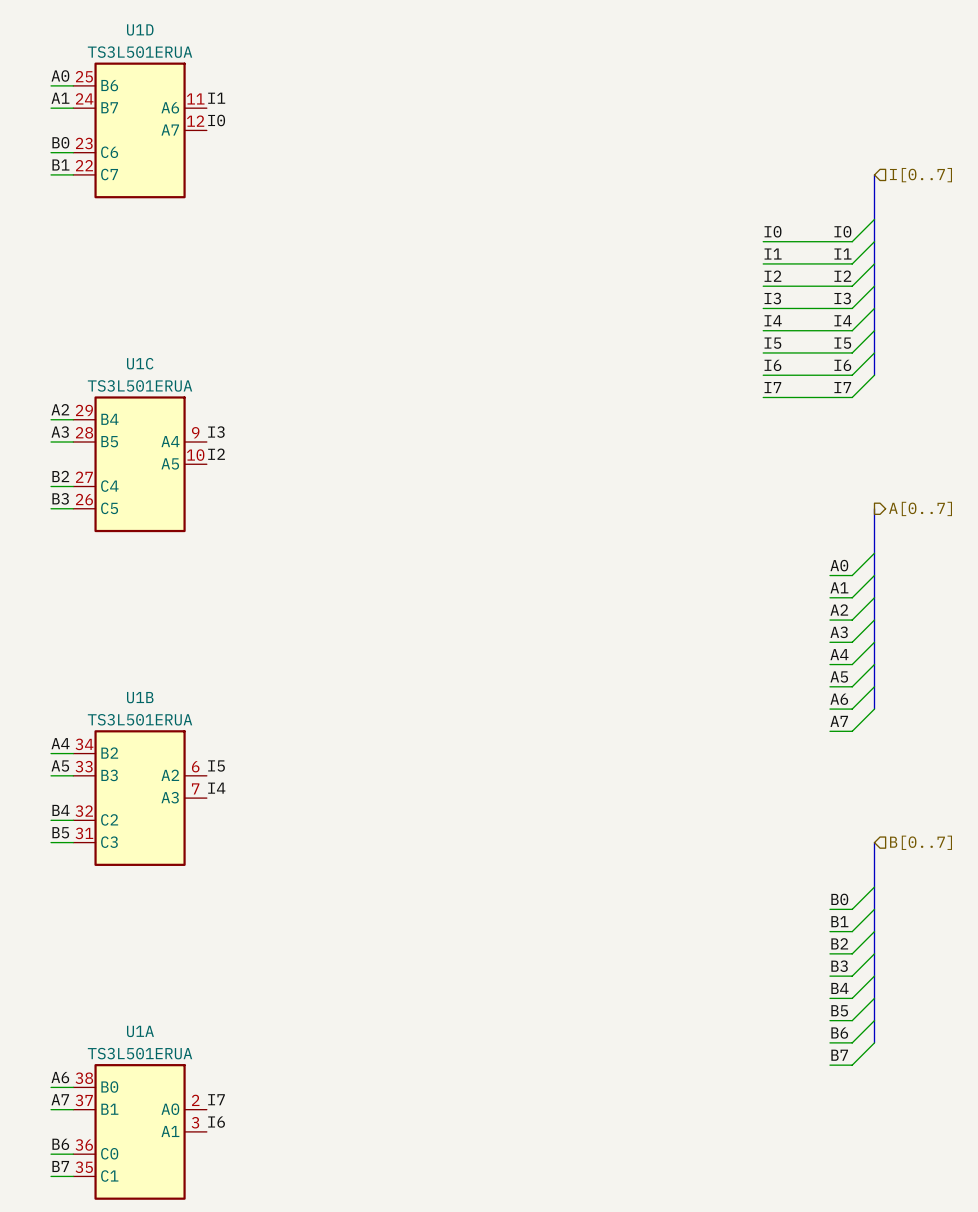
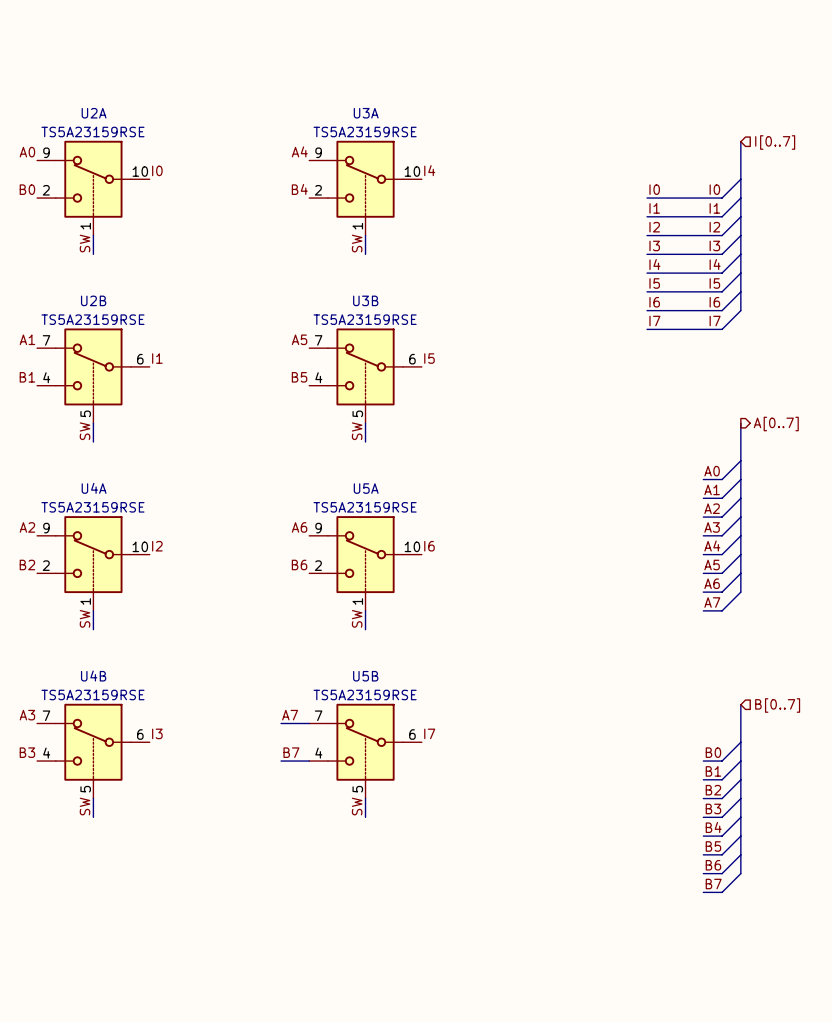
label position: A0 (60, 75) -> A0 (27, 152)
wire: (51, 85) (73, 85) -> none
label: A1 (60, 98) -> none
label: I1 (216, 98) -> none
wire: (51, 108) (73, 108) -> none
label position: I0 (216, 120) -> I0 (157, 170)
U1D: TS3L501ERUA (140, 130) -> none
label position: B0 (60, 142) -> B0 (27, 189)
wire: (51, 152) (73, 152) -> none
label: B1 (60, 165) -> none
wire: (51, 174) (73, 174) -> none
label: none -> A4 (299, 151)
label: none -> I4 (429, 170)
U2A: none -> TS5A23159RSE (93, 188)
U3A: none -> TS5A23159RSE (365, 188)
label: none -> B4 (299, 189)
wire: none -> (93, 235) (93, 254)
wire: none -> (365, 235) (365, 254)
label: none -> SW (85, 243)
label: none -> SW (357, 243)
label: none -> A1 (27, 339)
label: A2 (60, 409) -> none
label: none -> A5 (299, 339)
label: A3 (60, 432) -> none
label: none -> I1 (157, 358)
label: I3 (216, 432) -> none
label: none -> I5 (429, 358)
wire: (51, 442) (73, 442) -> none
U2B: none -> TS5A23159RSE (93, 375)
U3B: none -> TS5A23159RSE (365, 375)
label: none -> B1 (27, 377)
label position: I2 (216, 454) -> I2 (157, 546)
label: none -> B5 (299, 377)
U1C: TS3L501ERUA (140, 464) -> none
label position: B2 (60, 476) -> B2 (27, 564)
wire: (51, 486) (73, 486) -> none
label: B3 (60, 498) -> none
wire: (51, 508) (73, 508) -> none
wire: none -> (365, 423) (365, 441)
label: none -> SW (85, 431)
label: none -> SW (357, 431)
label: none -> A2 (27, 527)
label: none -> A6 (299, 527)
label: none -> I6 (429, 546)
U4A: none -> TS5A23159RSE (93, 563)
U5A: none -> TS5A23159RSE (365, 563)
label: none -> B6 (299, 564)
wire: none -> (365, 610) (365, 629)
label: A4 (60, 743) -> none
label: none -> SW (85, 618)
label: none -> SW (357, 618)
wire: (51, 753) (73, 753) -> none
label: A5 (60, 765) -> none
label: I5 (216, 765) -> none
wire: (51, 775) (73, 775) -> none
label: I4 (216, 788) -> none
U1B: TS3L501ERUA (140, 798) -> none
label: B4 (61, 810) -> none
wire: (51, 820) (73, 820) -> none
label: B5 (60, 832) -> none
wire: (51, 842) (73, 842) -> none
label: none -> A3 (27, 715)
label: none -> A7 (290, 715)
wire: none -> (281, 723) (309, 723)
label: none -> I3 (157, 733)
label: none -> I7 (429, 733)
U4B: none -> TS5A23159RSE (93, 751)
U5B: none -> TS5A23159RSE (365, 751)
label: none -> B3 (27, 752)
label: none -> B7 (291, 752)
wire: none -> (281, 761) (309, 761)
wire: none -> (93, 798) (93, 817)
wire: none -> (365, 798) (365, 817)
label: none -> SW (85, 806)
label: none -> SW (357, 806)
label: A6 (60, 1077) -> none
wire: (51, 1087) (73, 1087) -> none
label: A7 (60, 1099) -> none
label: I7 (216, 1099) -> none
wire: (51, 1109) (73, 1109) -> none
label: I6 (216, 1122) -> none
U1A: TS3L501ERUA (140, 1131) -> none
label: B6 (60, 1144) -> none
wire: (51, 1154) (73, 1154) -> none
label: B7 (60, 1166) -> none
wire: (51, 1176) (73, 1176) -> none

